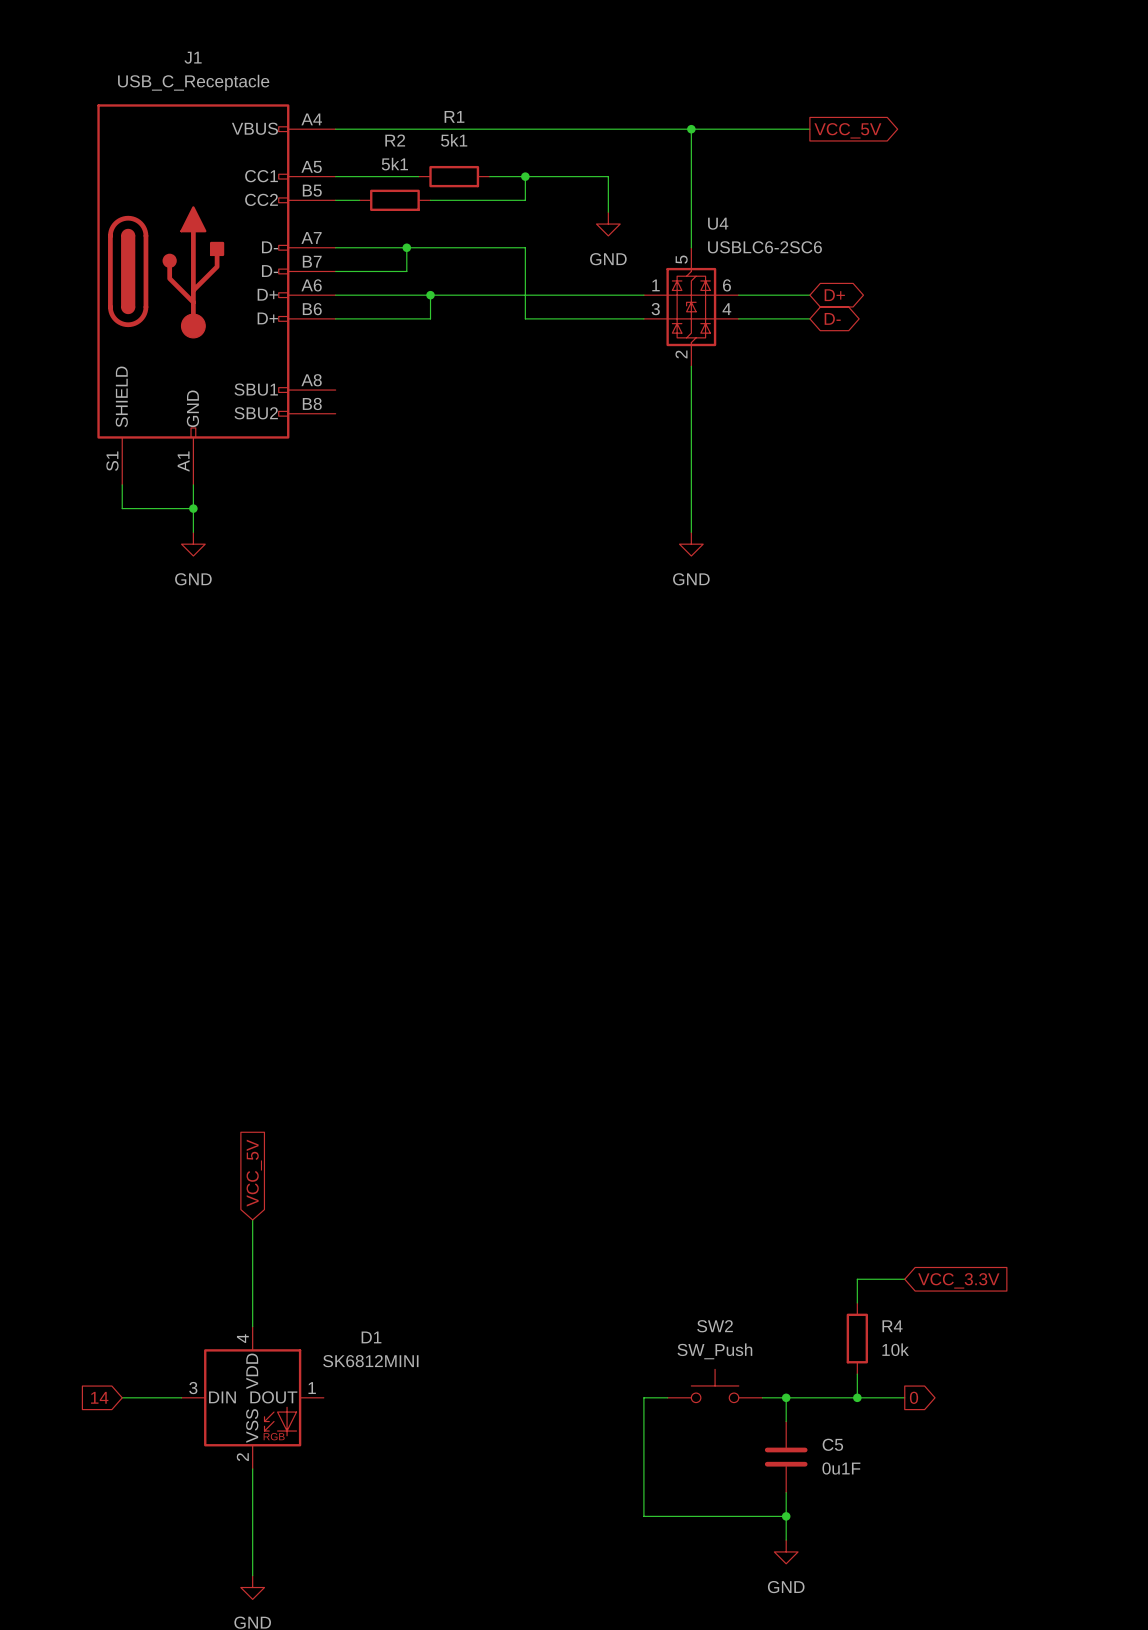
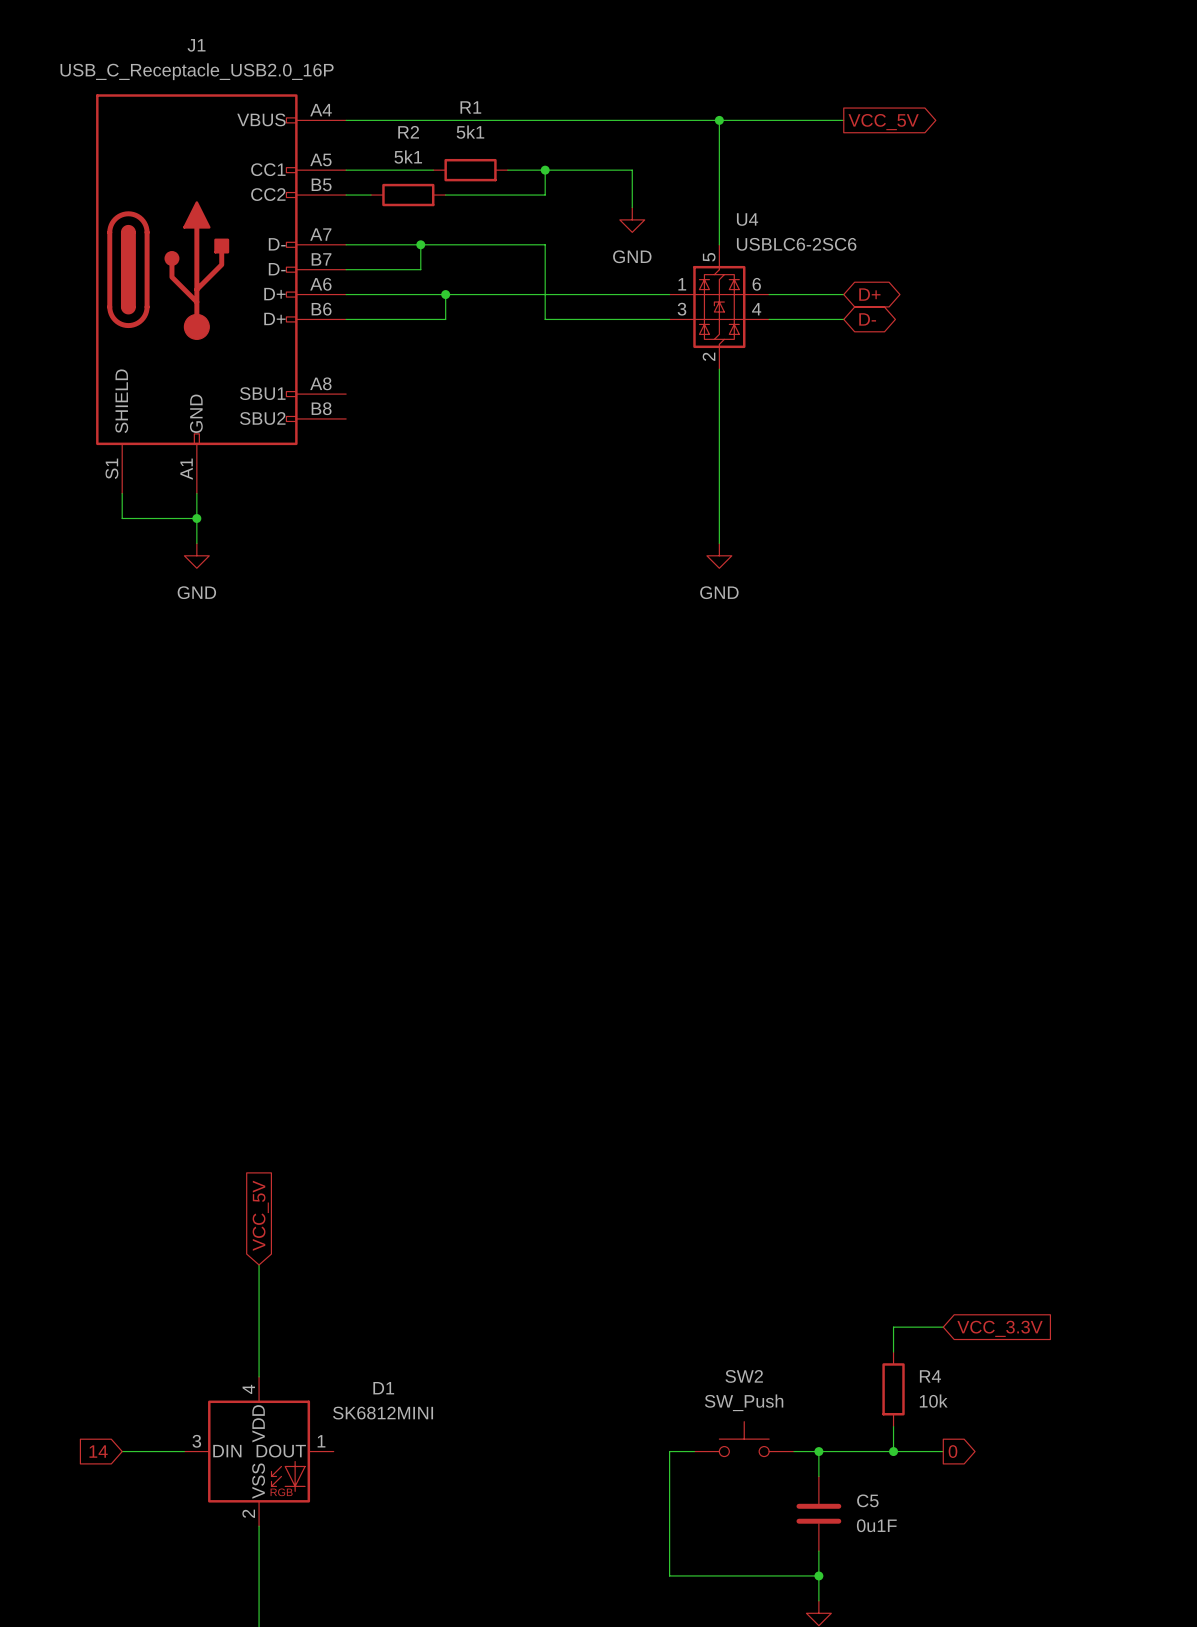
J1 value: USB_C_Receptacle (193, 82) -> USB_C_Receptacle_USB2.0_16P (197, 71)

